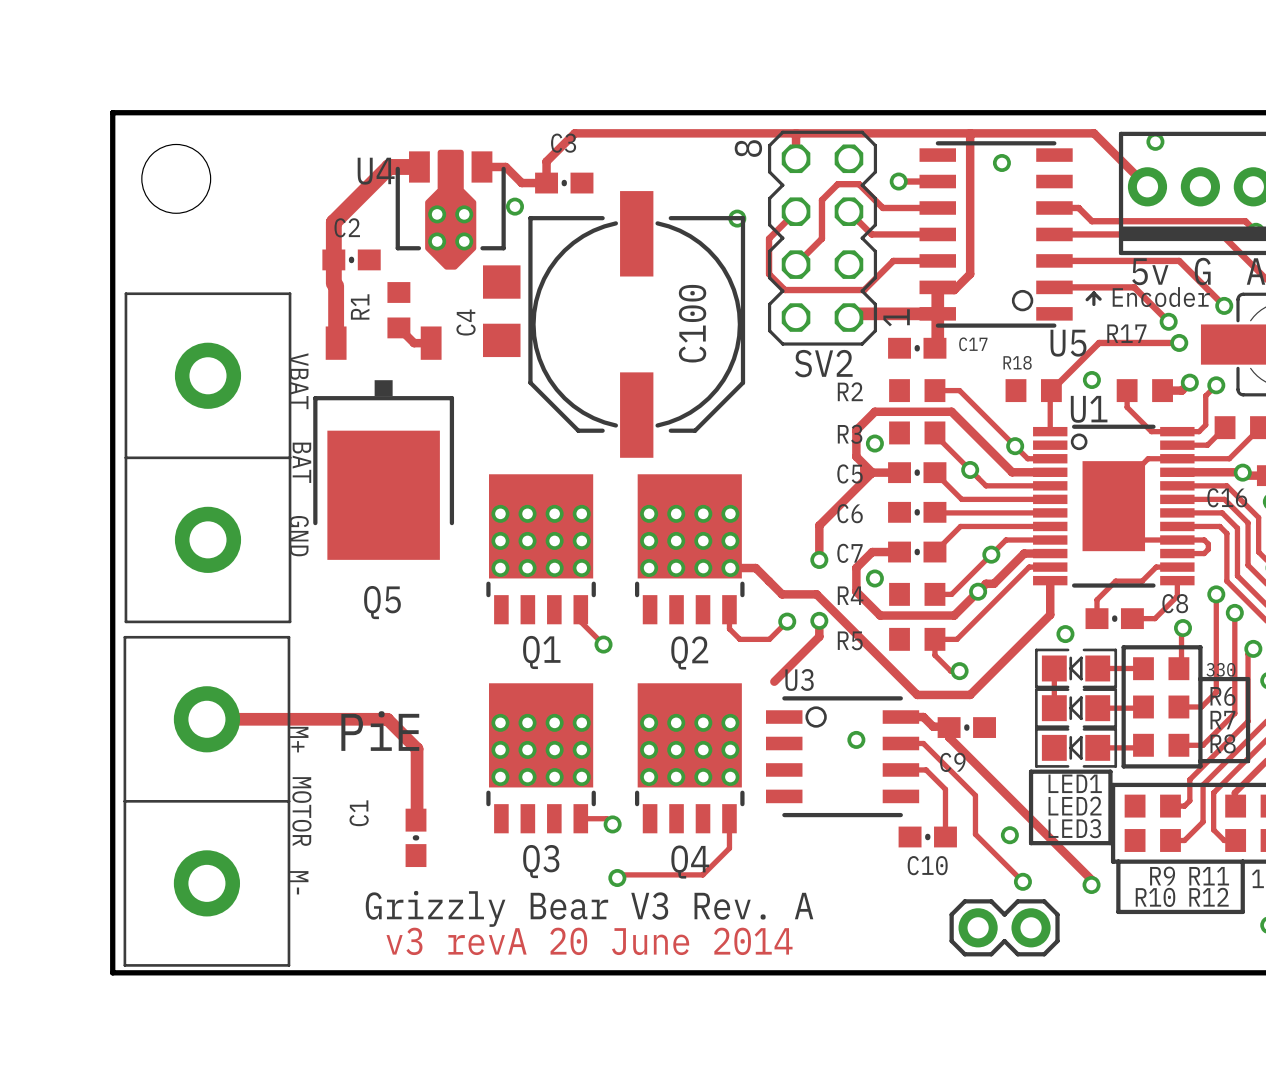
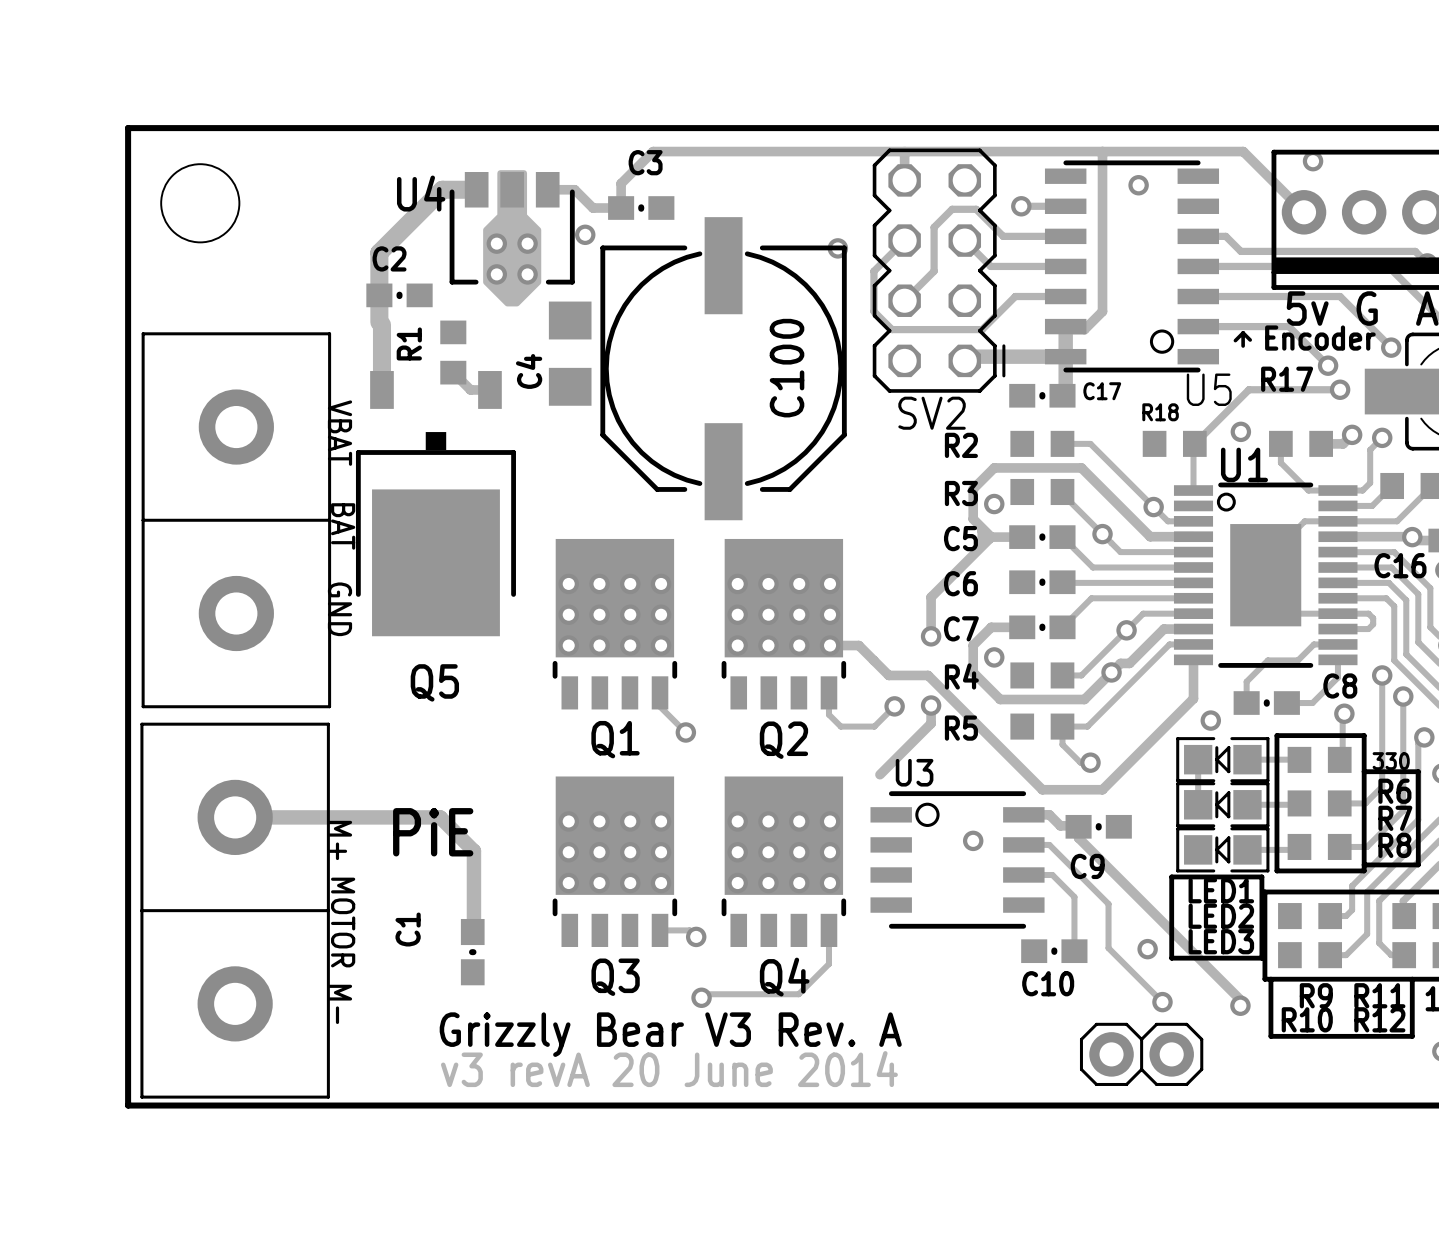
SV2 footprint: [767, 130, 878, 346] -> [872, 148, 1006, 393]
part footprint: [949, 899, 1060, 957] -> [1079, 1022, 1204, 1086]

